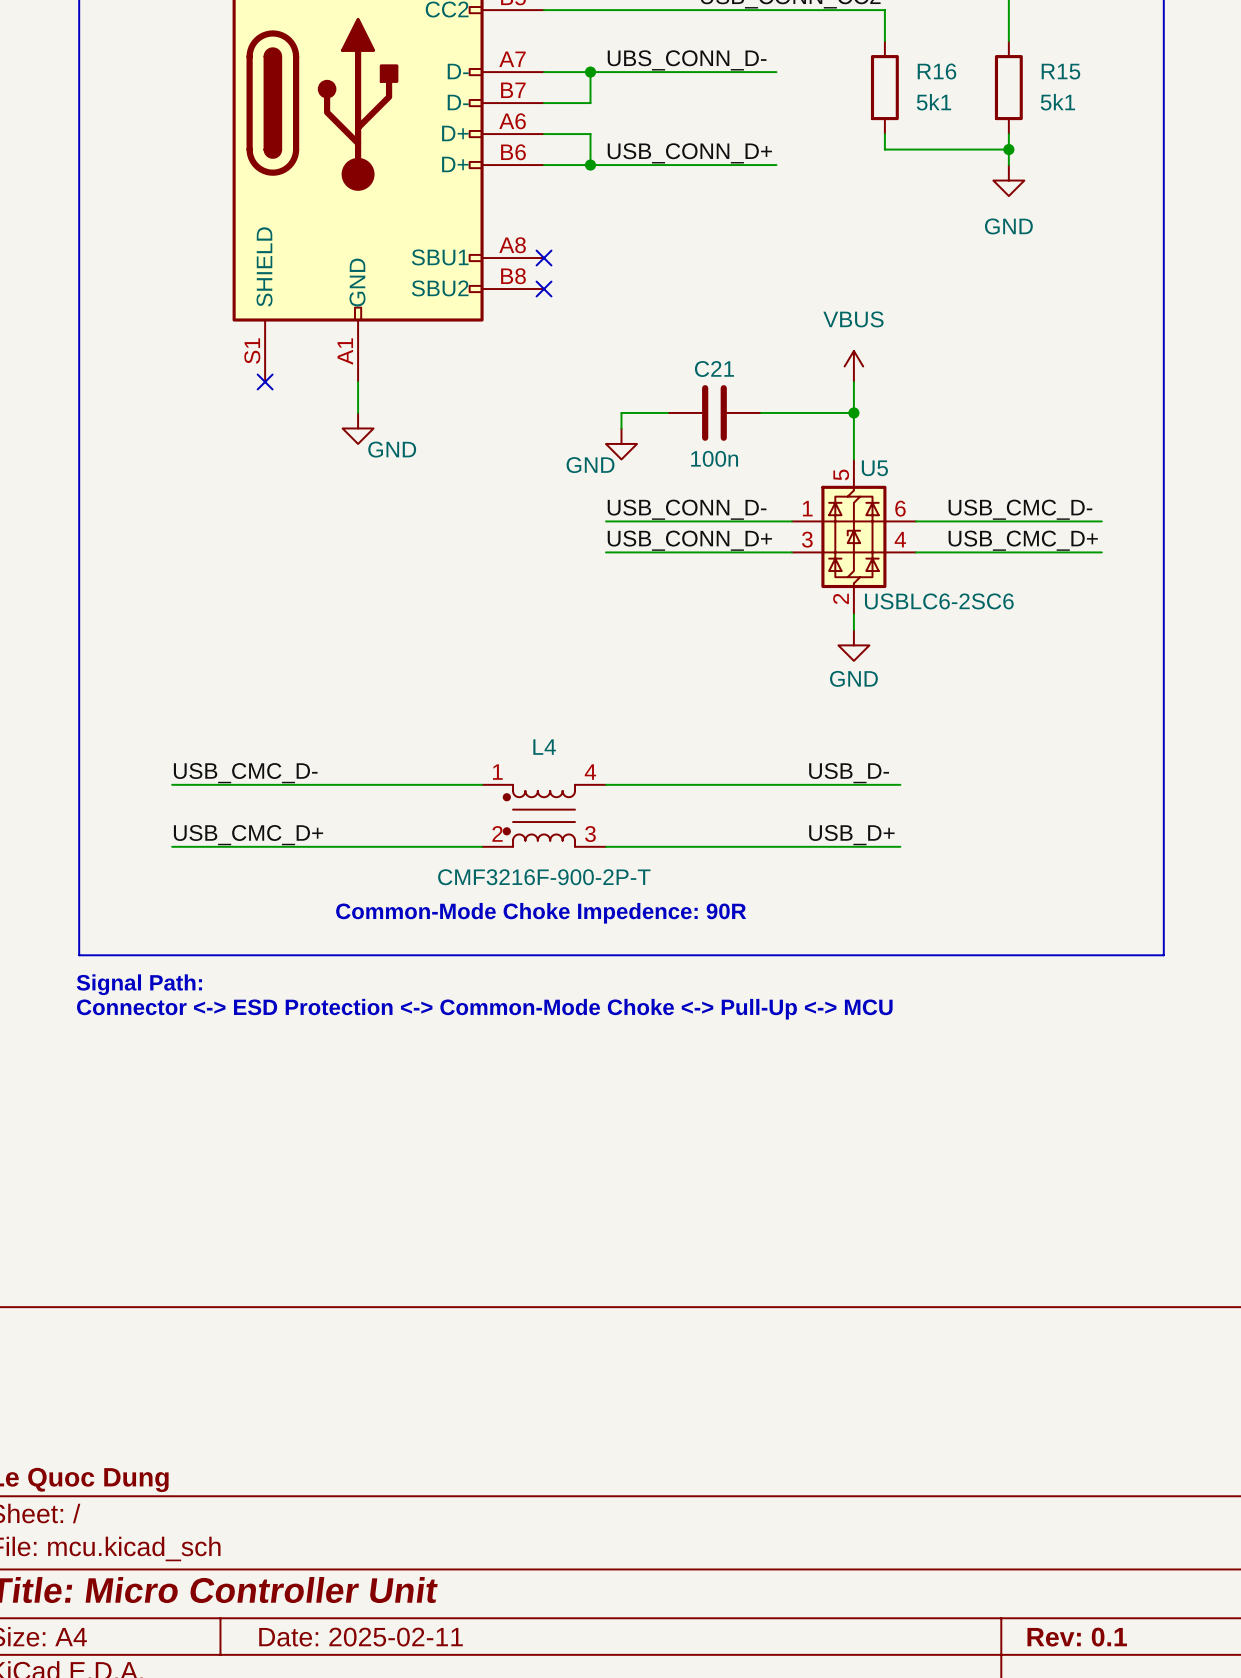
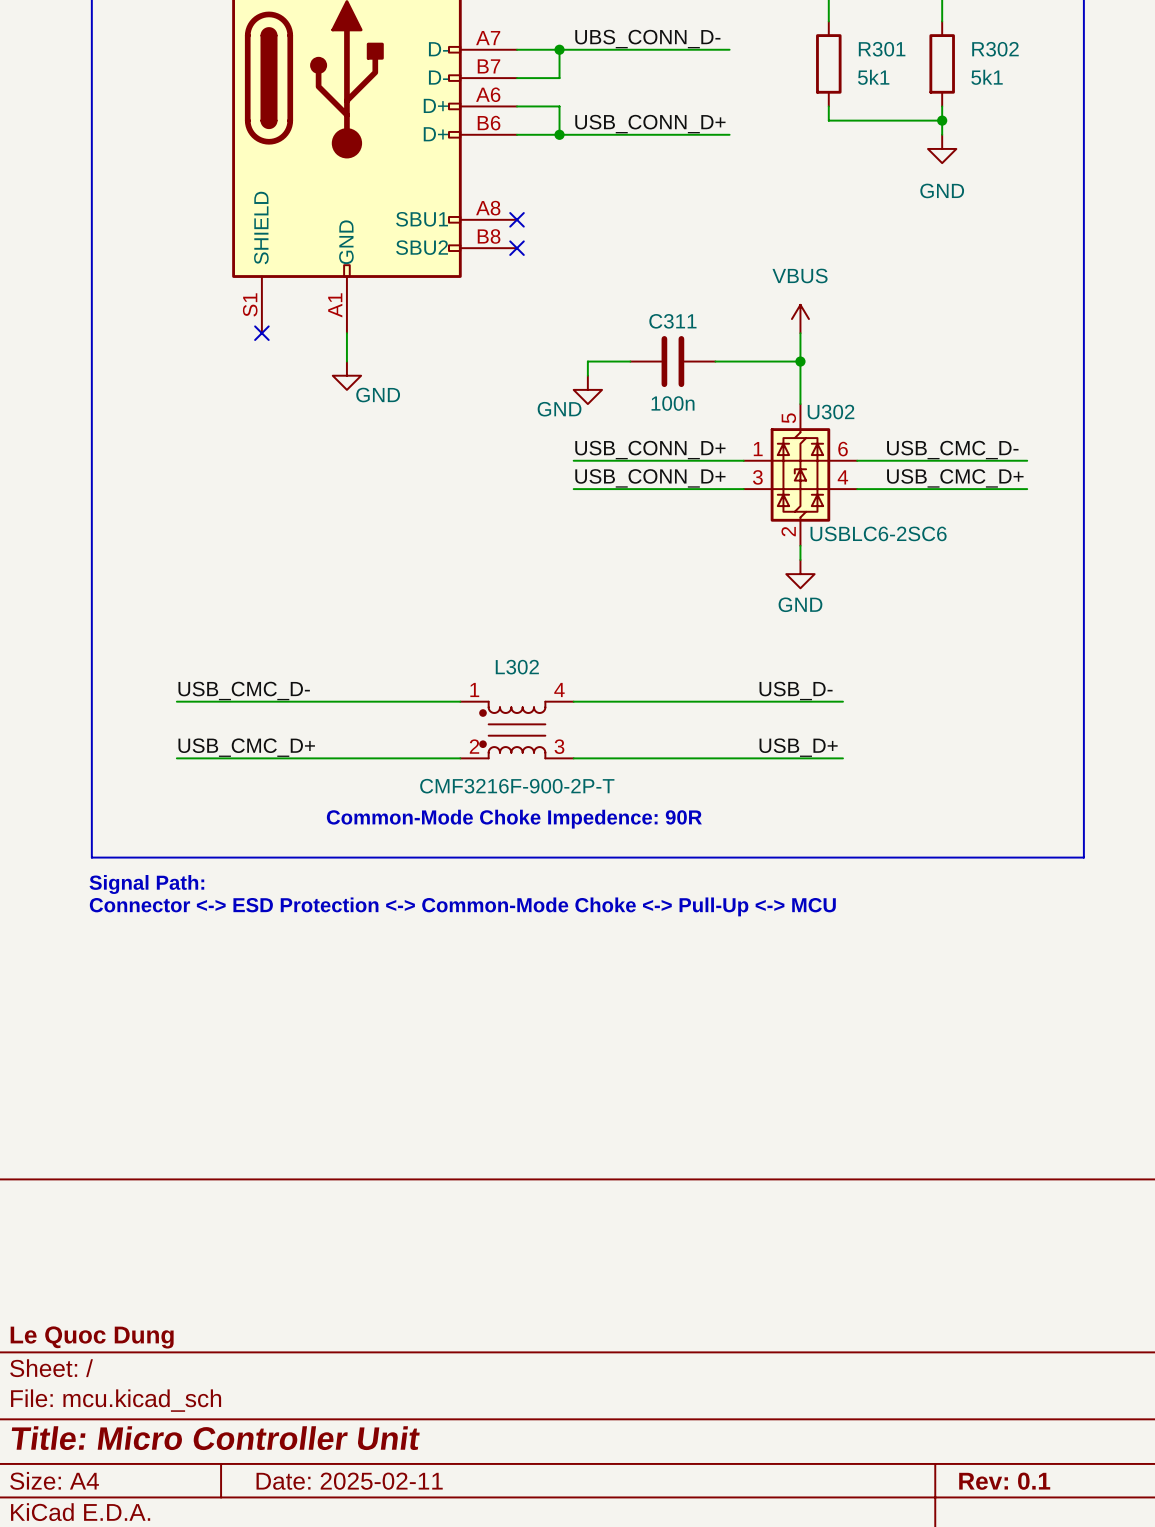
R16 name: R16 (936, 71) -> R301 (882, 49)
R15 name: R15 (1060, 71) -> R302 (995, 49)
C21 name: C21 (714, 369) -> C311 (672, 321)
U5 name: U5 (874, 468) -> U302 (831, 412)
label: USB_CONN_D- (687, 509) -> USB_CONN_D+ (650, 450)
L4 name: L4 (544, 747) -> L302 (517, 667)

